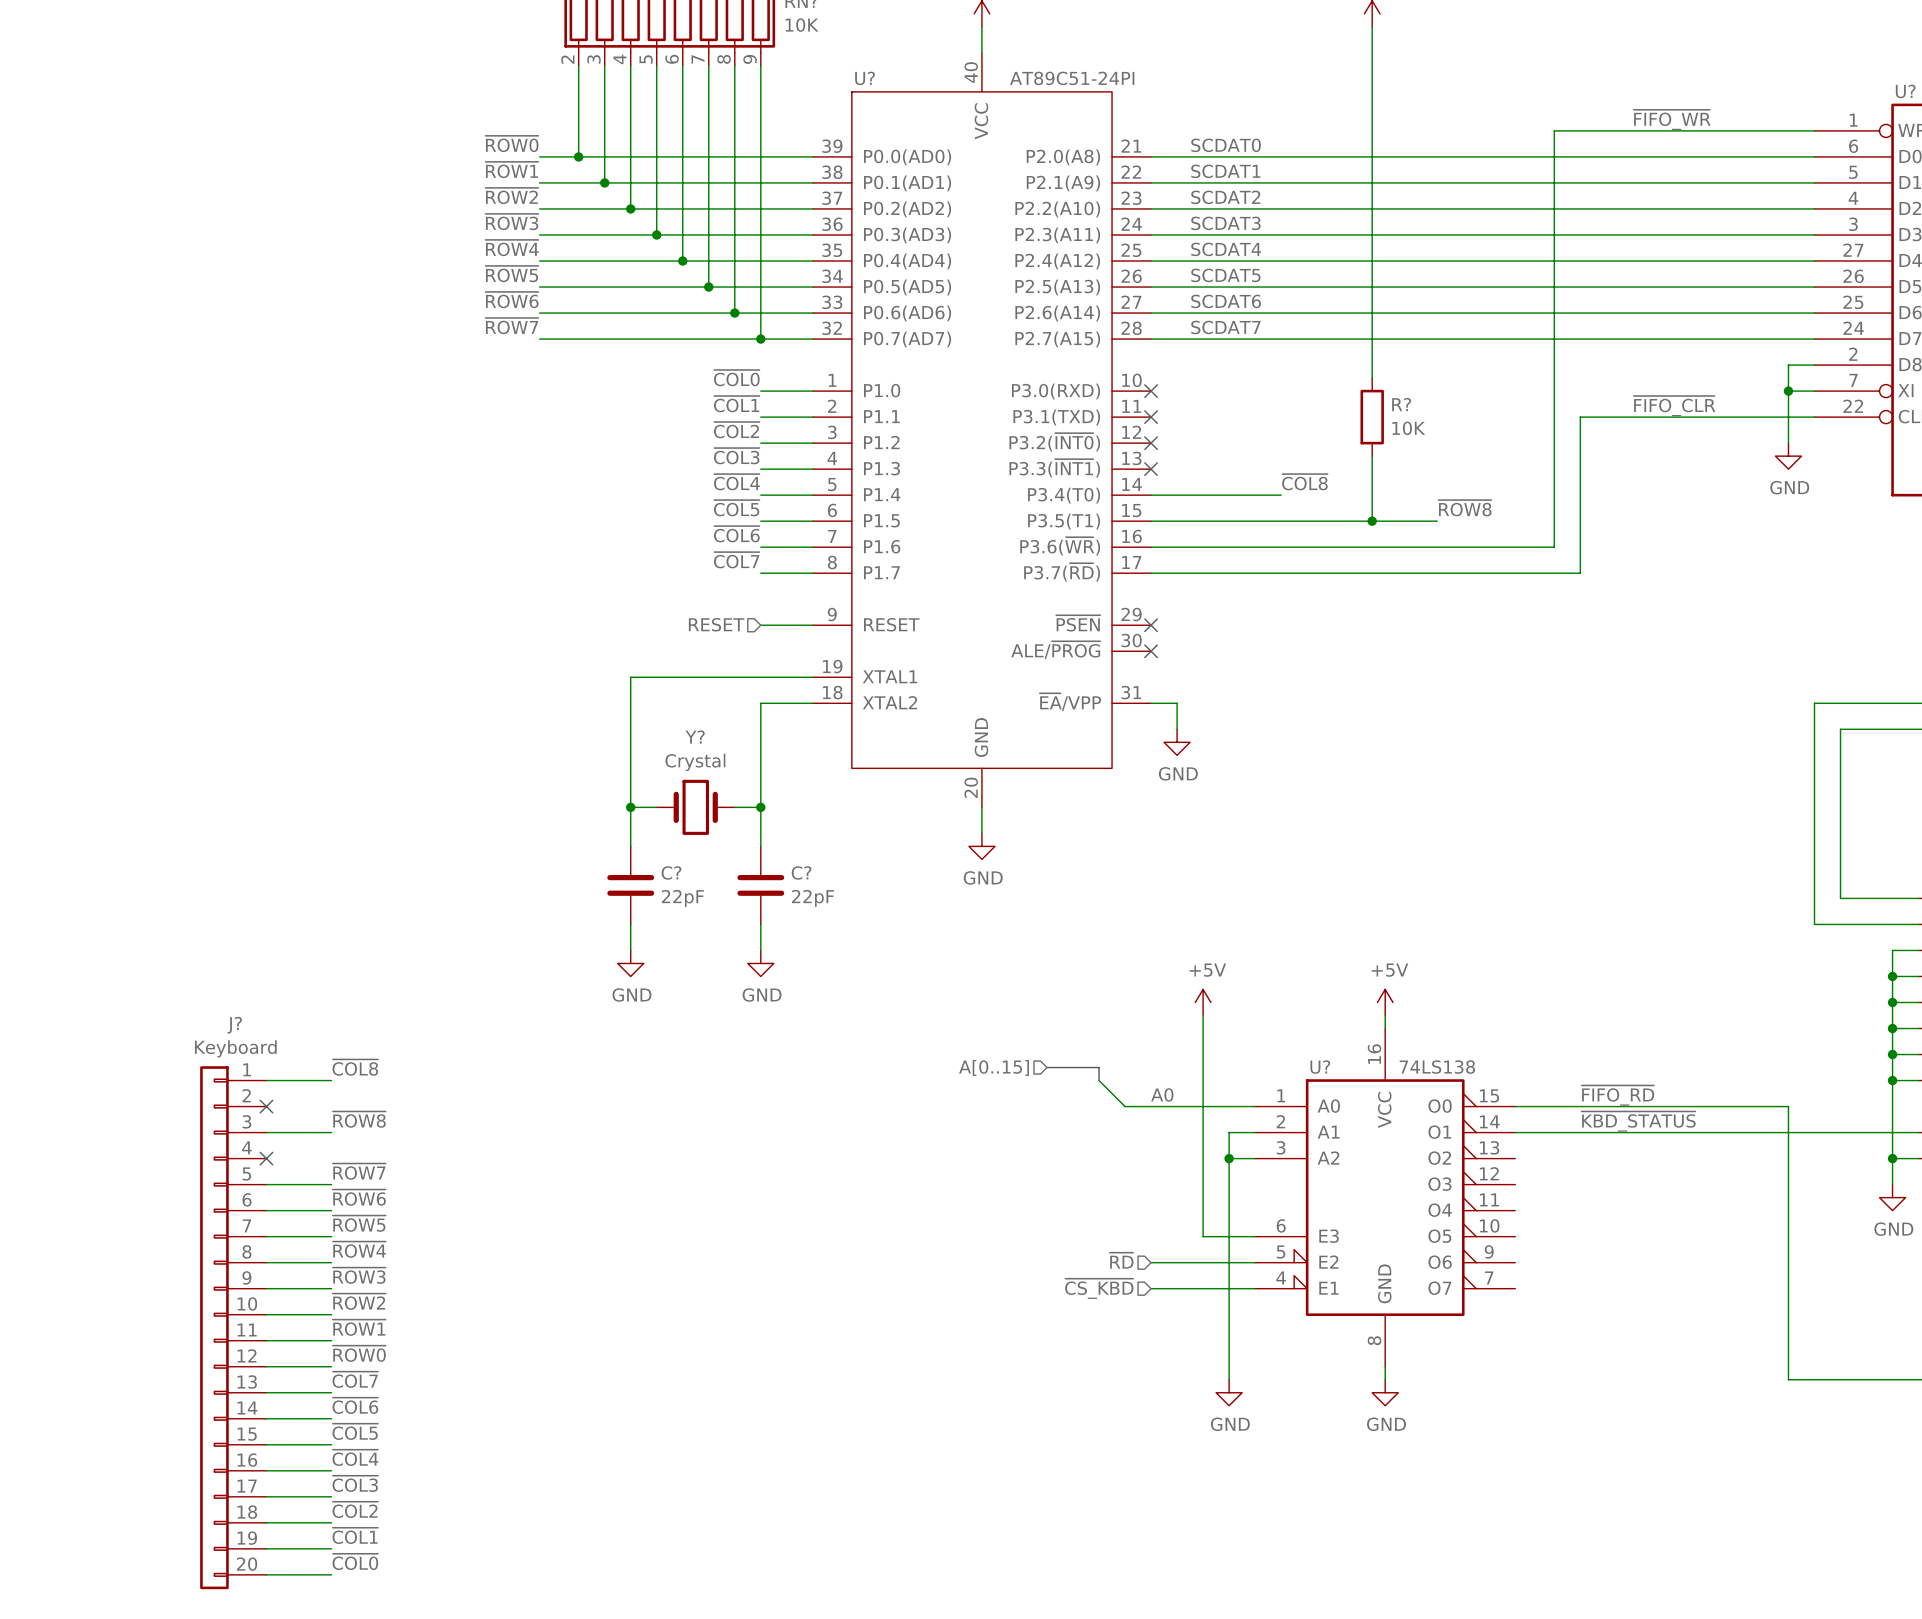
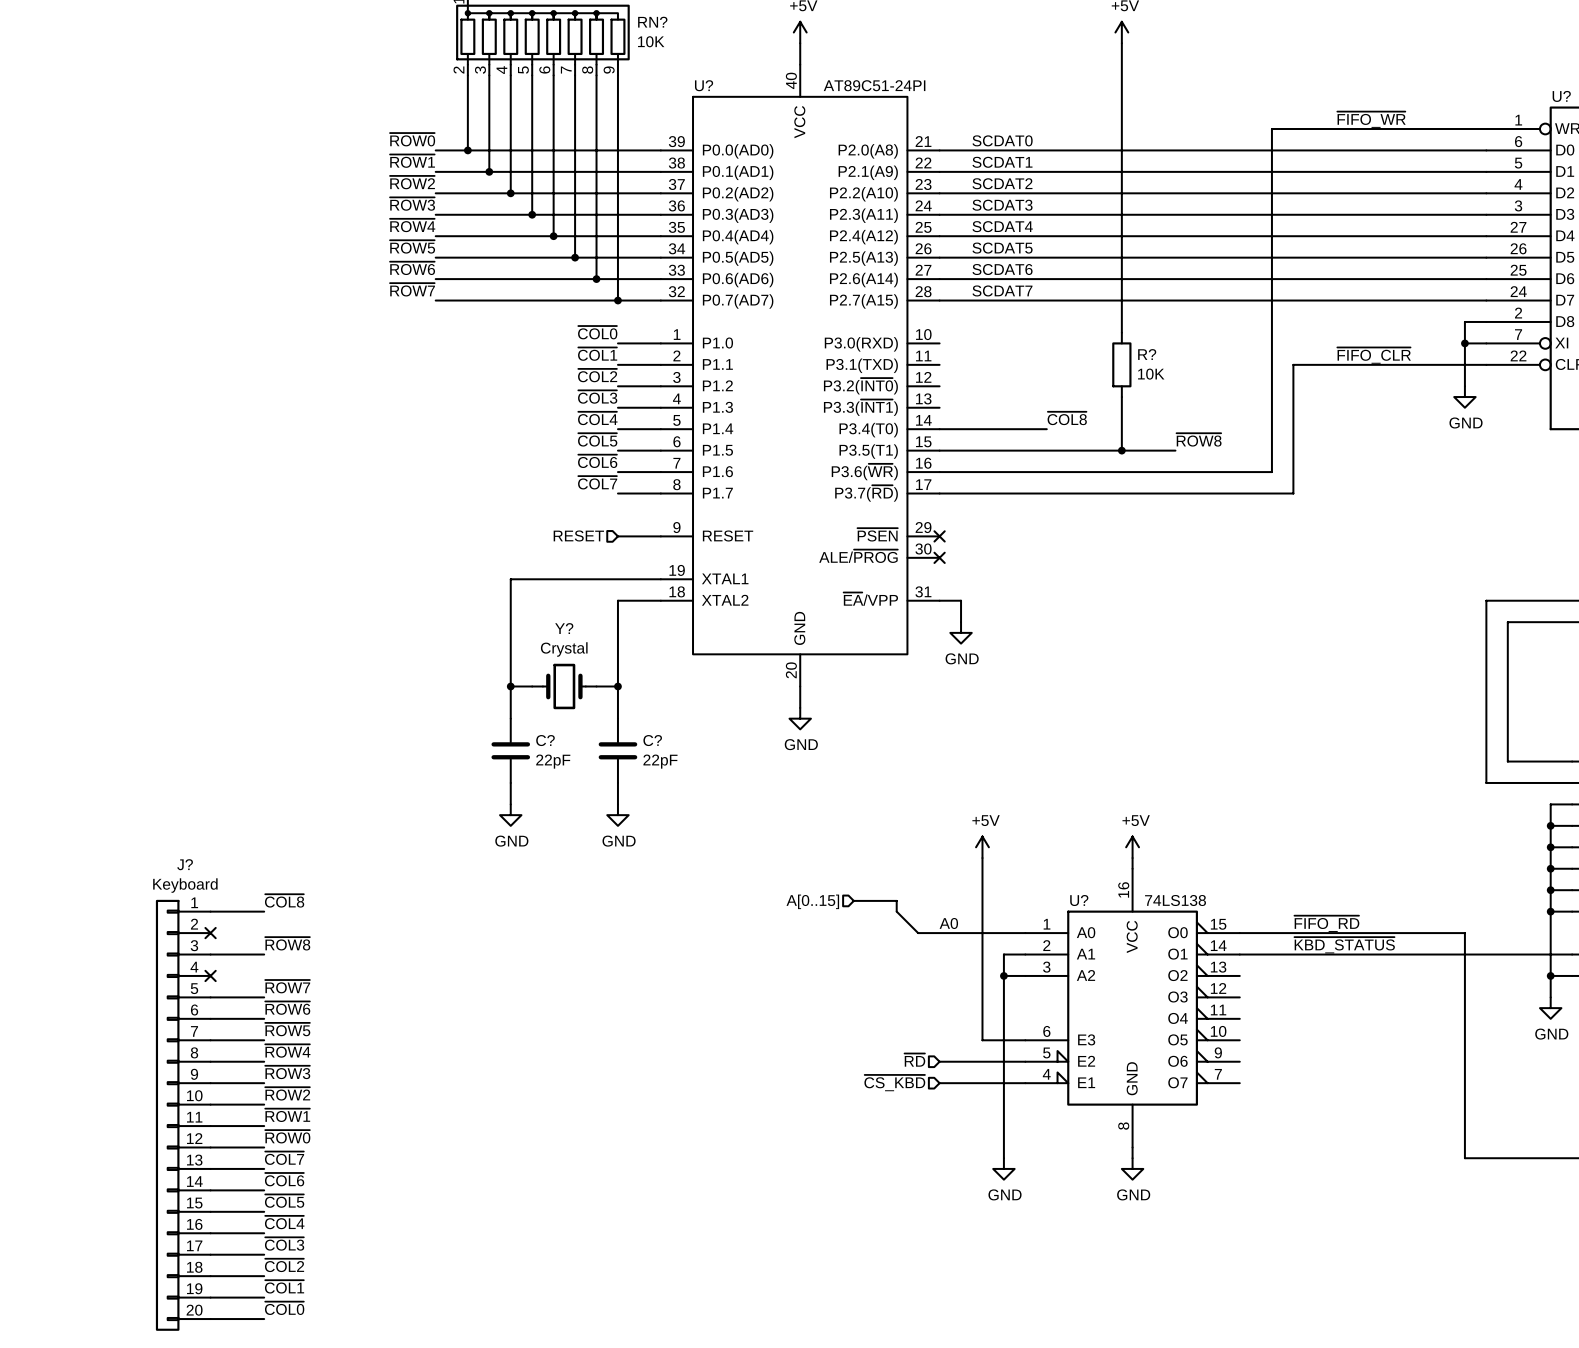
no-connect mark: (1151, 391) -> none
no-connect mark: (1151, 417) -> none
no-connect mark: (1151, 443) -> none
no-connect mark: (1151, 469) -> none

